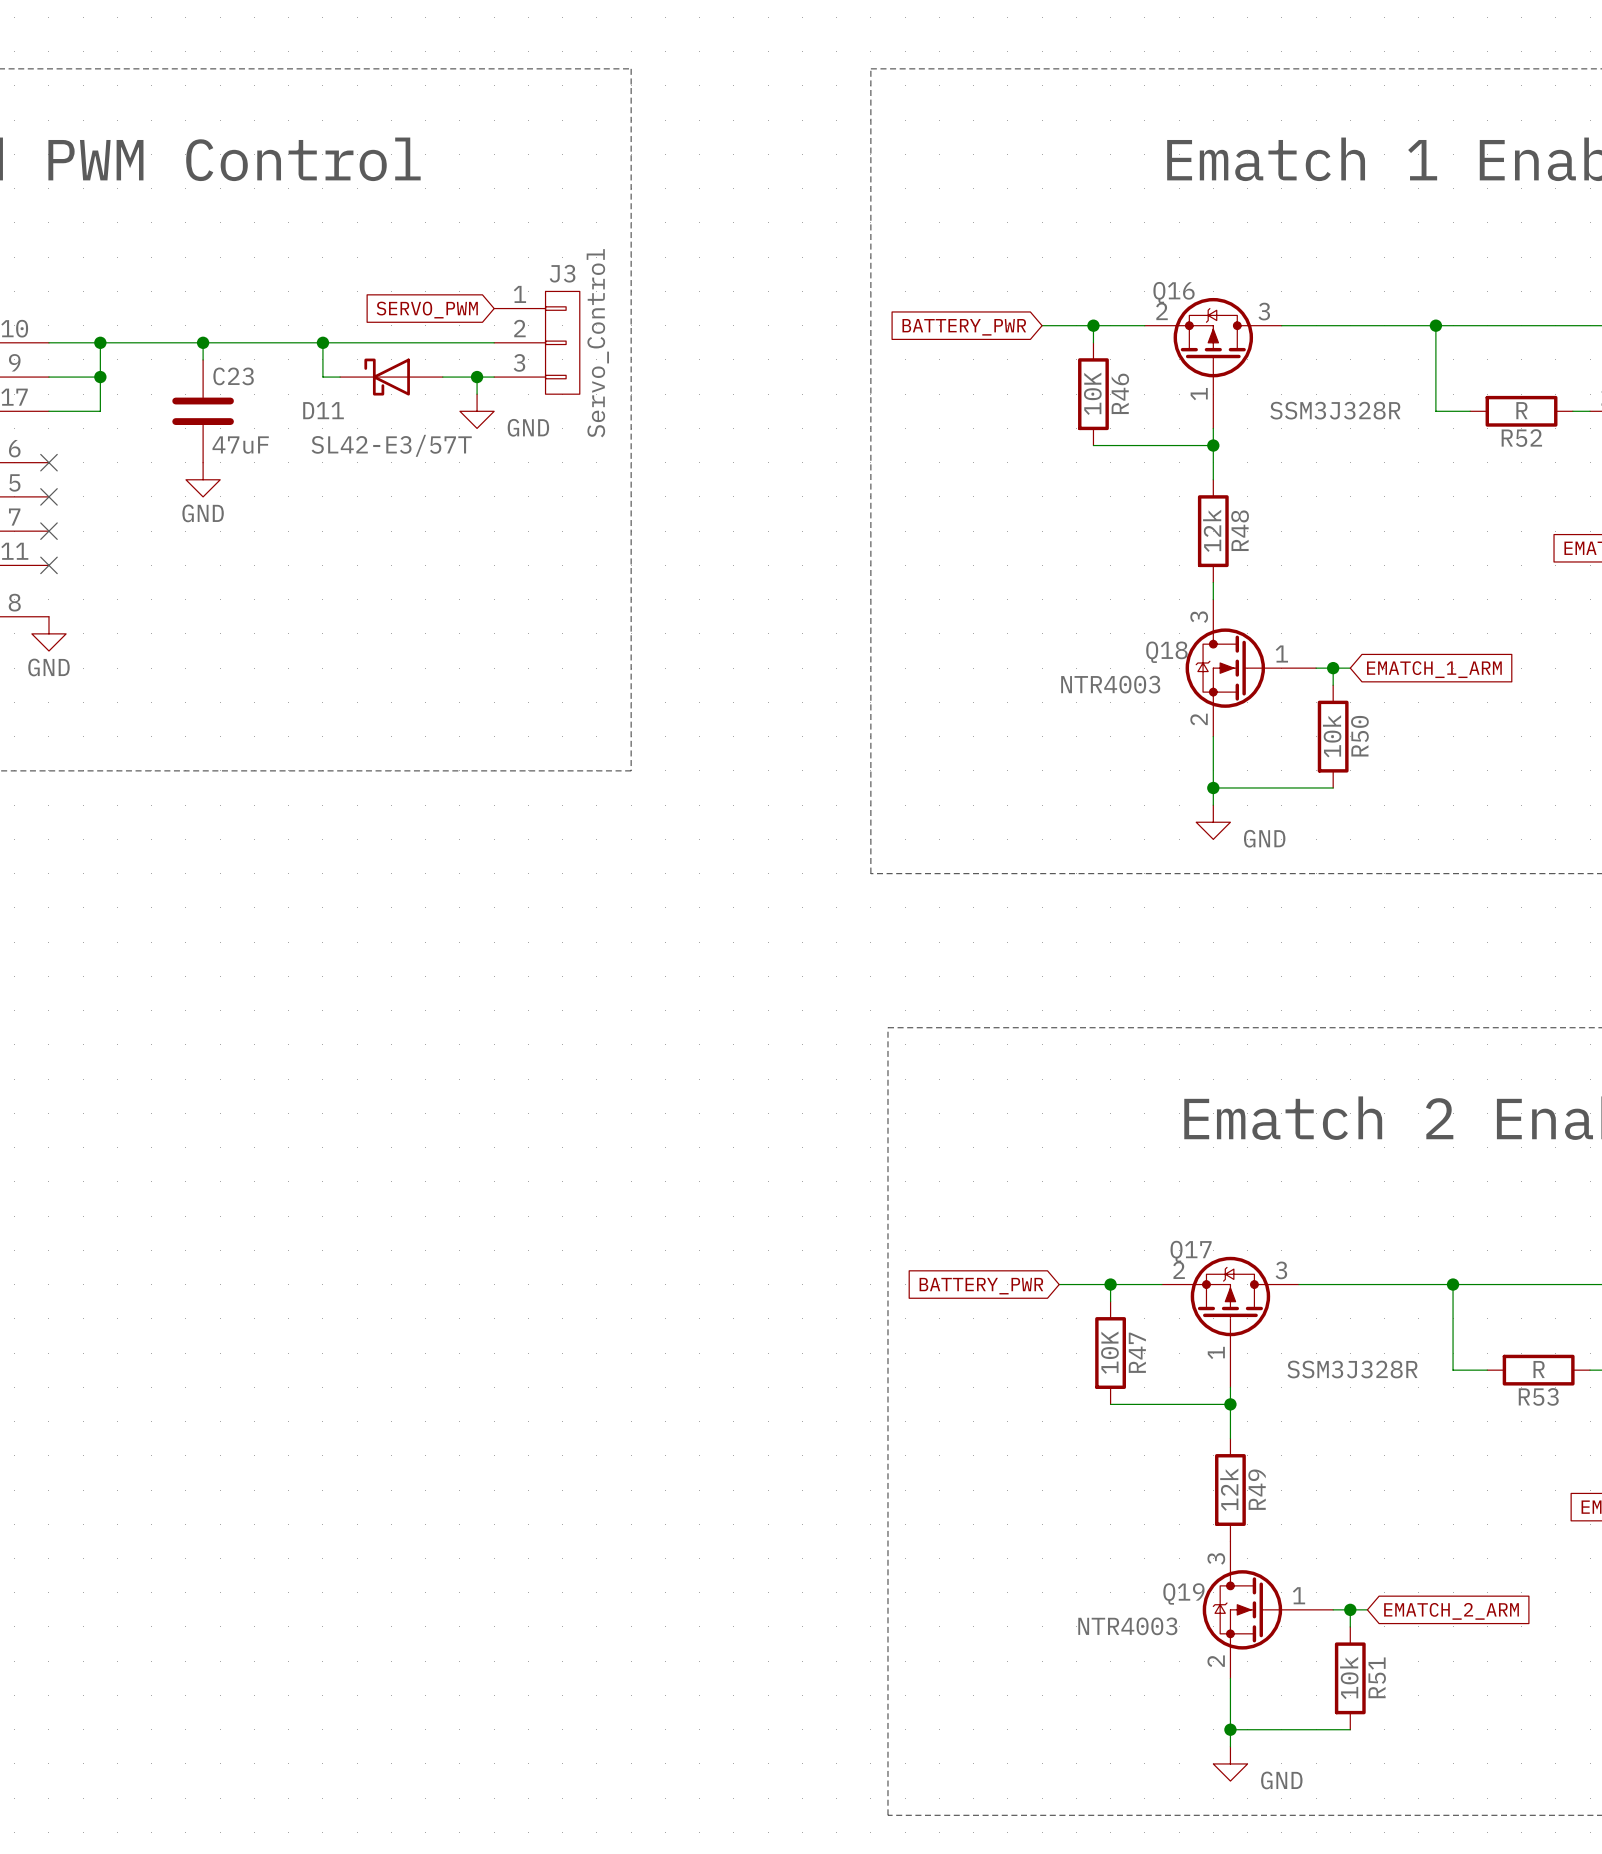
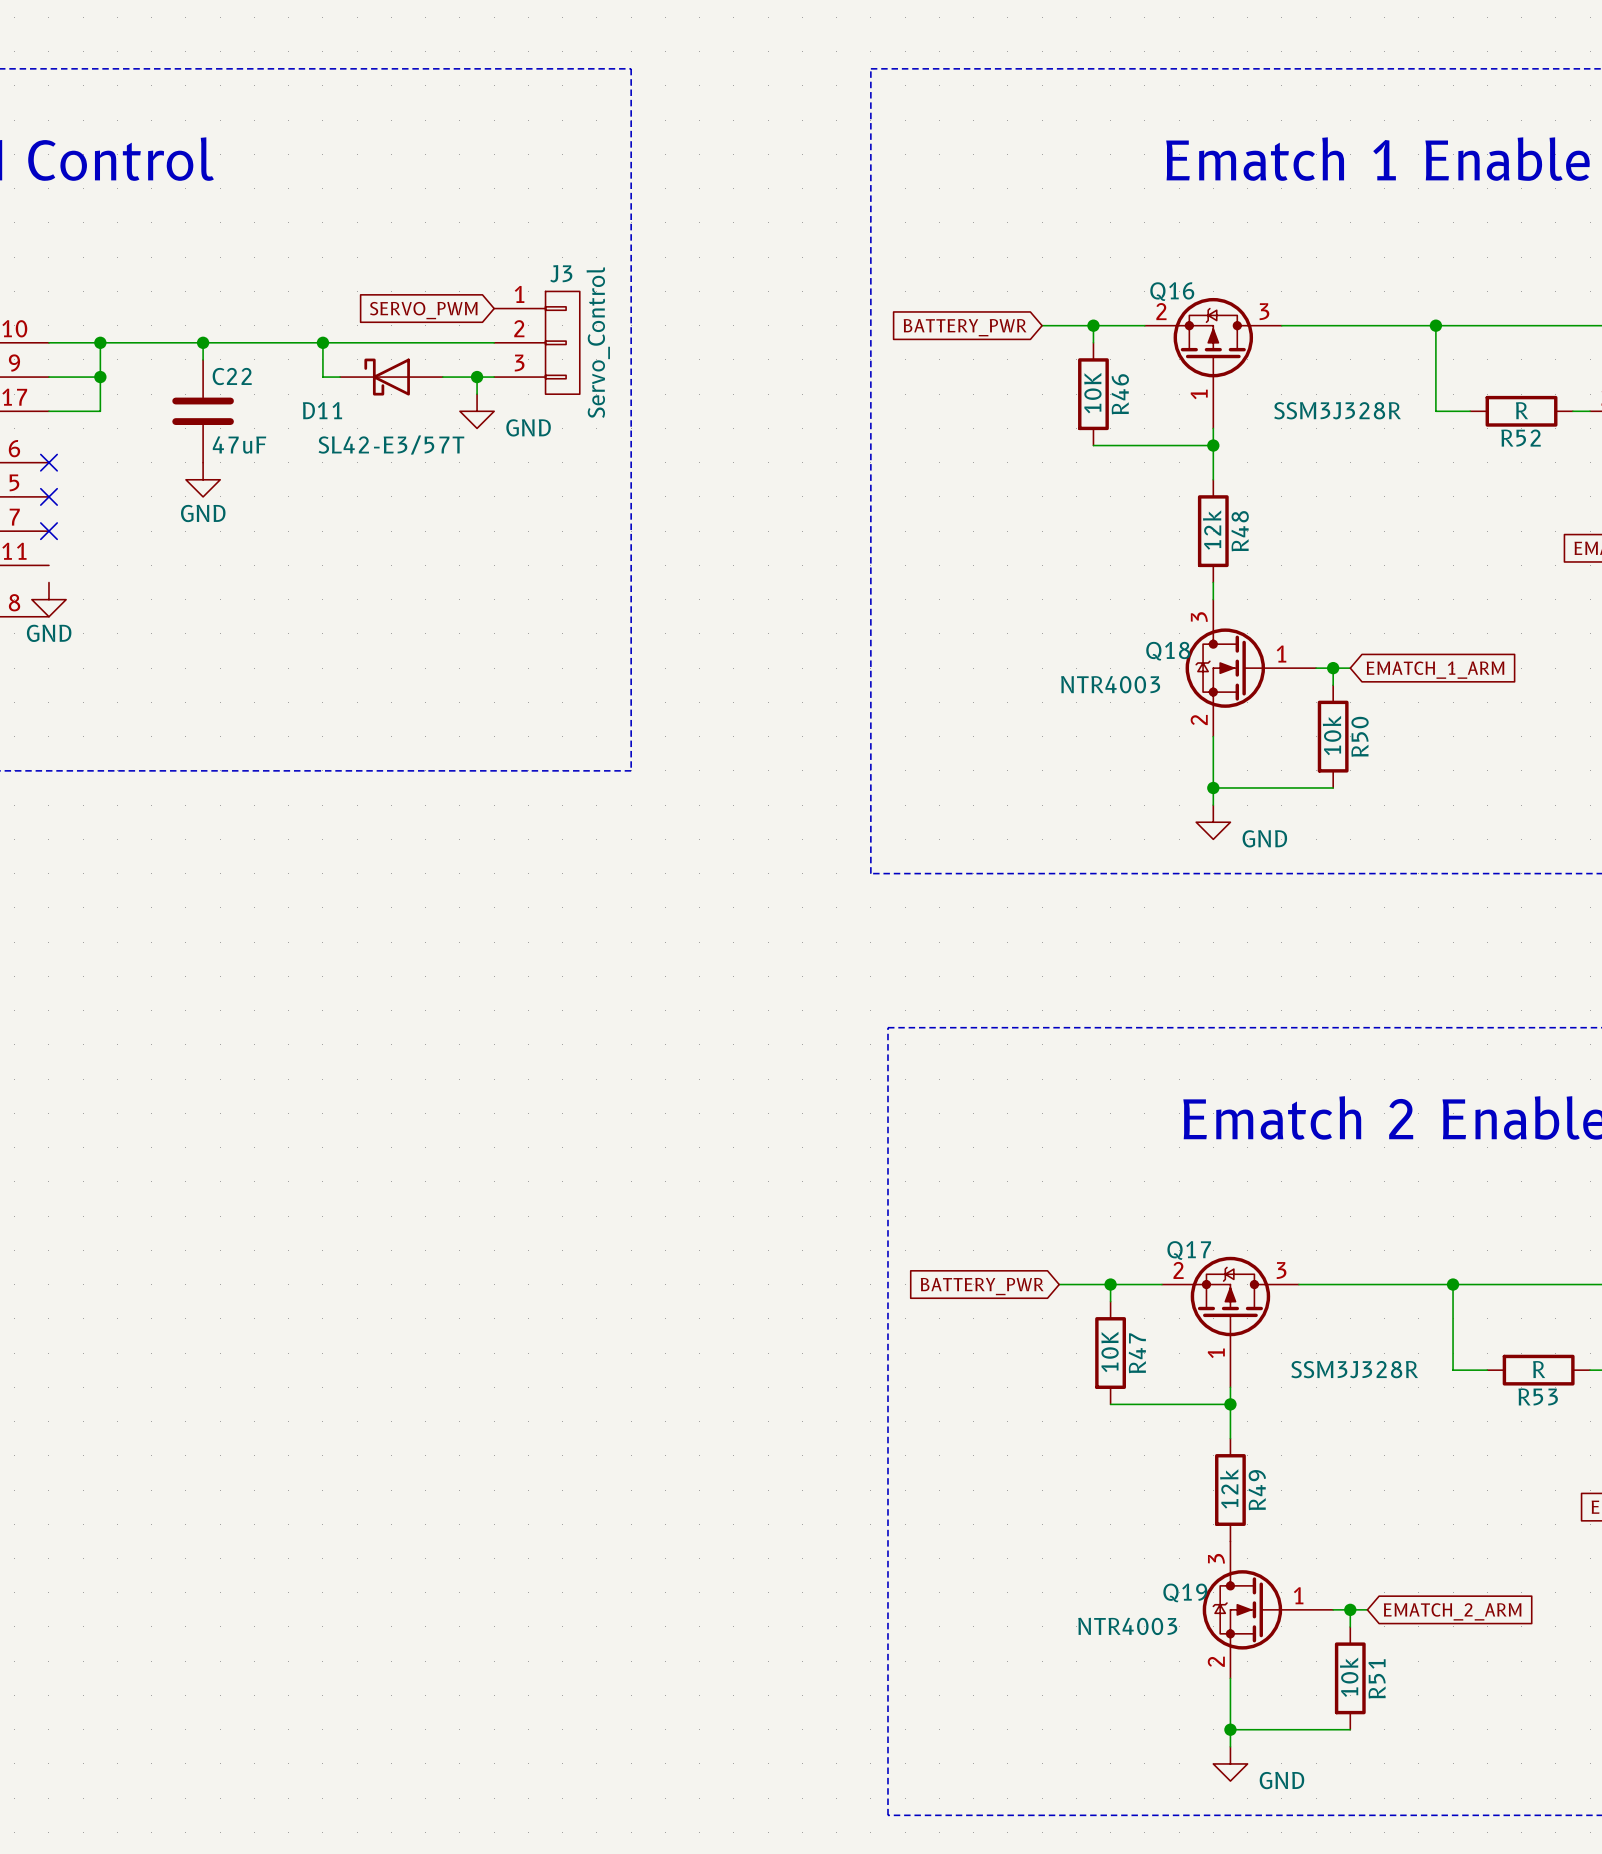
C23 name: C23 (233, 376) -> C22 (232, 376)
no-connect mark: (48, 565) -> none
power symbol position: GND (48, 633) -> GND (48, 599)

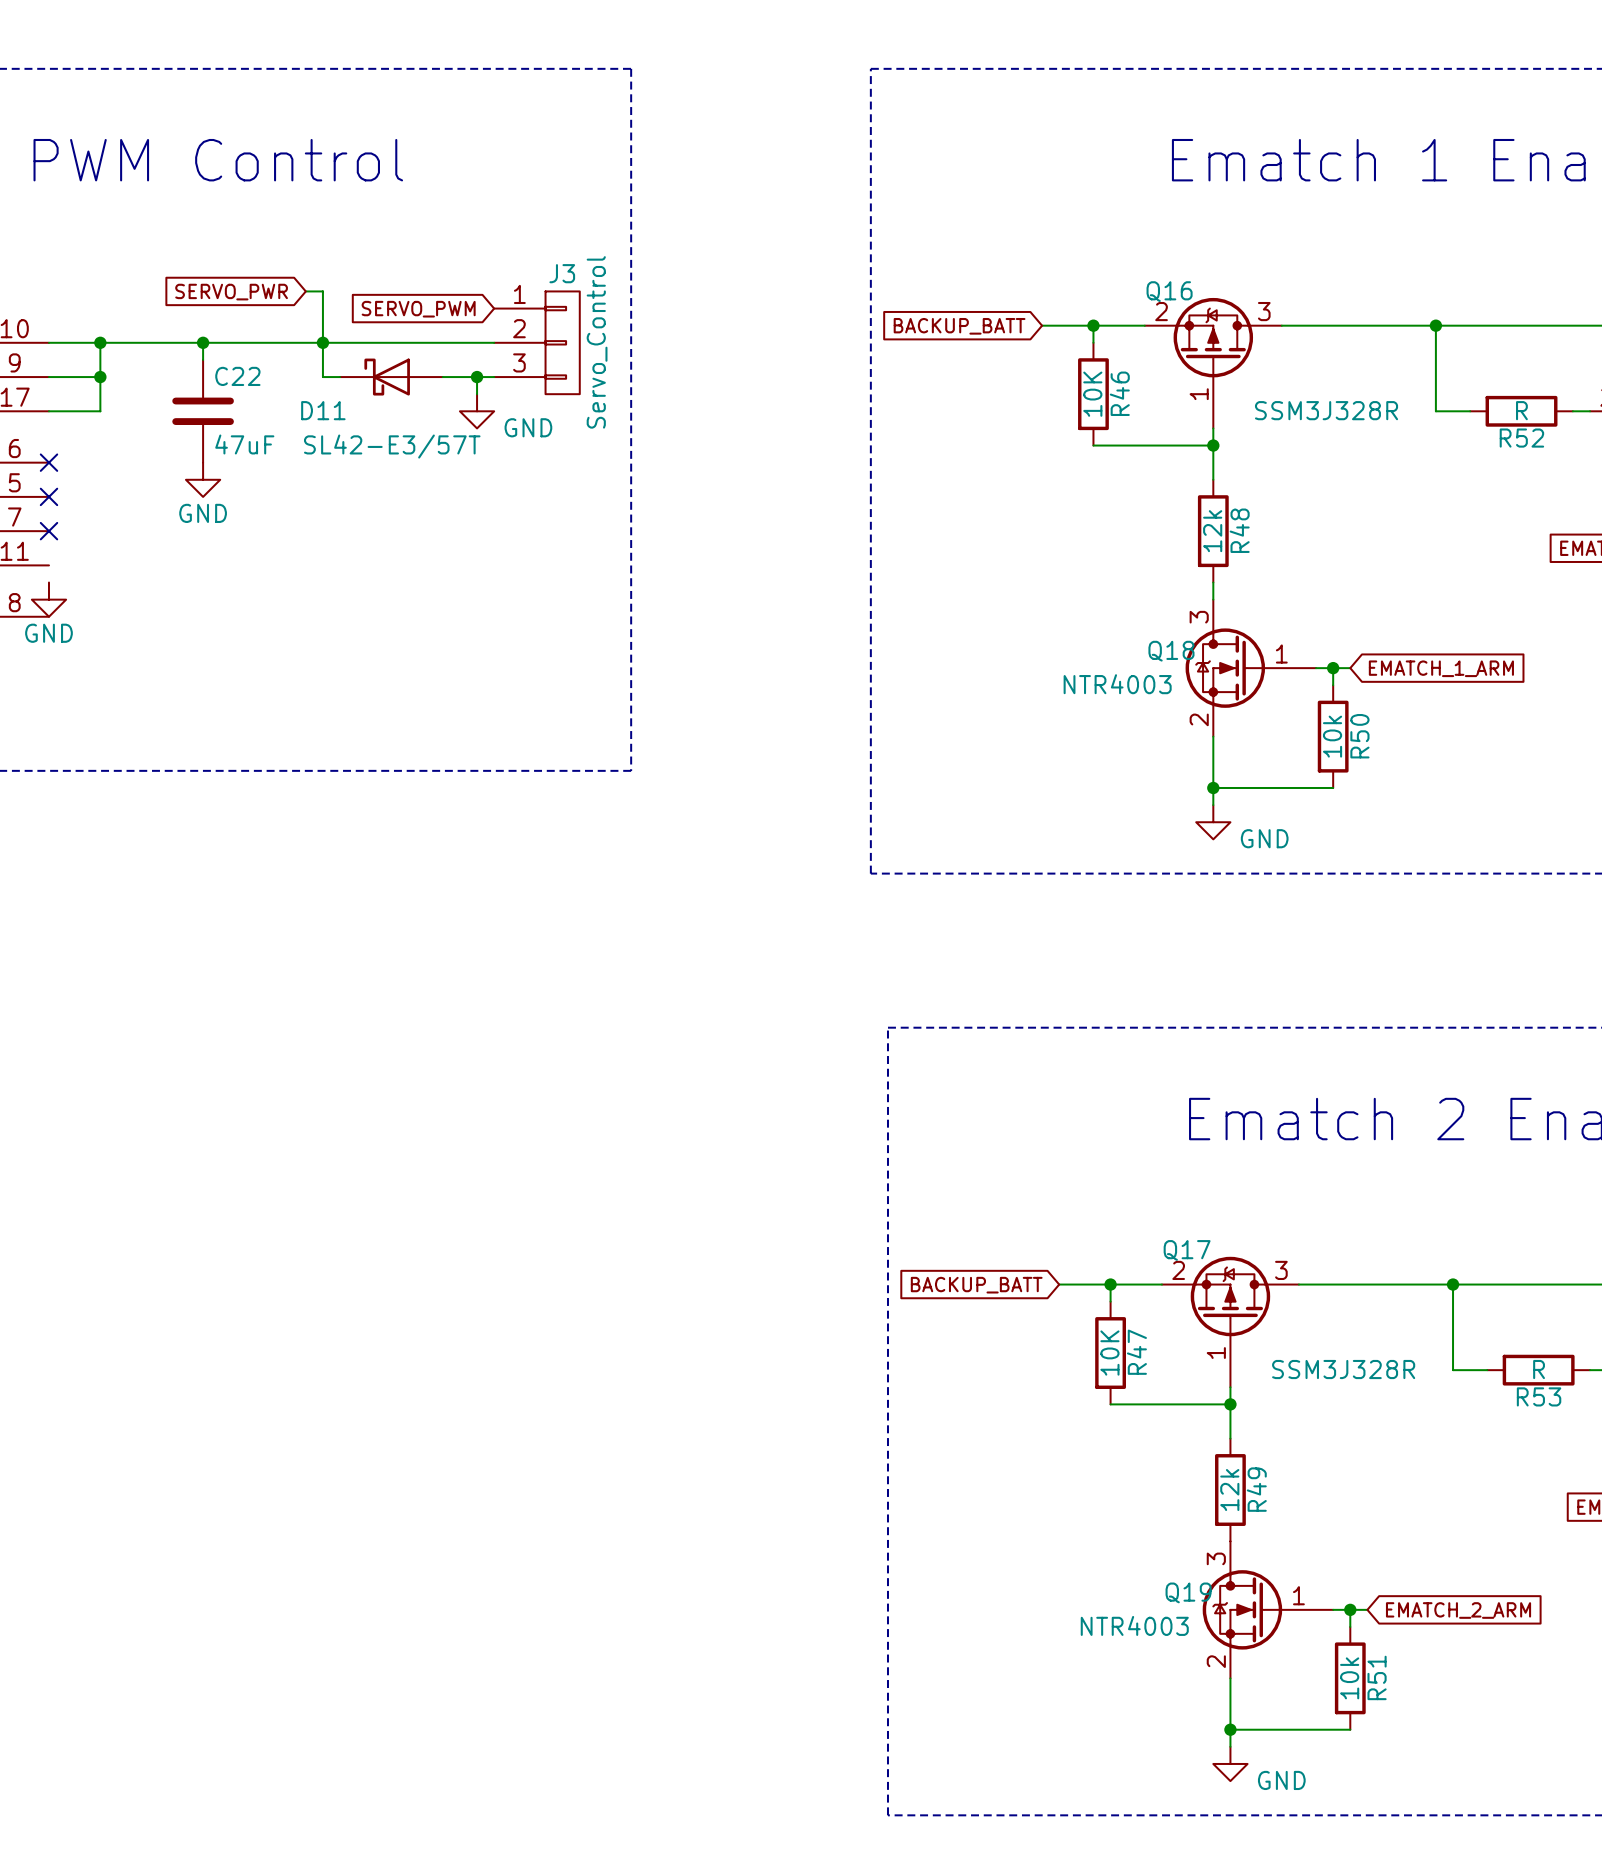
wire: none -> (305, 291) (322, 291) (322, 342)
global label: none -> SERVO_PWR (231, 292)
global label: BATTERY_PWR (965, 327) -> BACKUP_BATT (959, 326)
global label: BATTERY_PWR (982, 1286) -> BACKUP_BATT (976, 1285)

